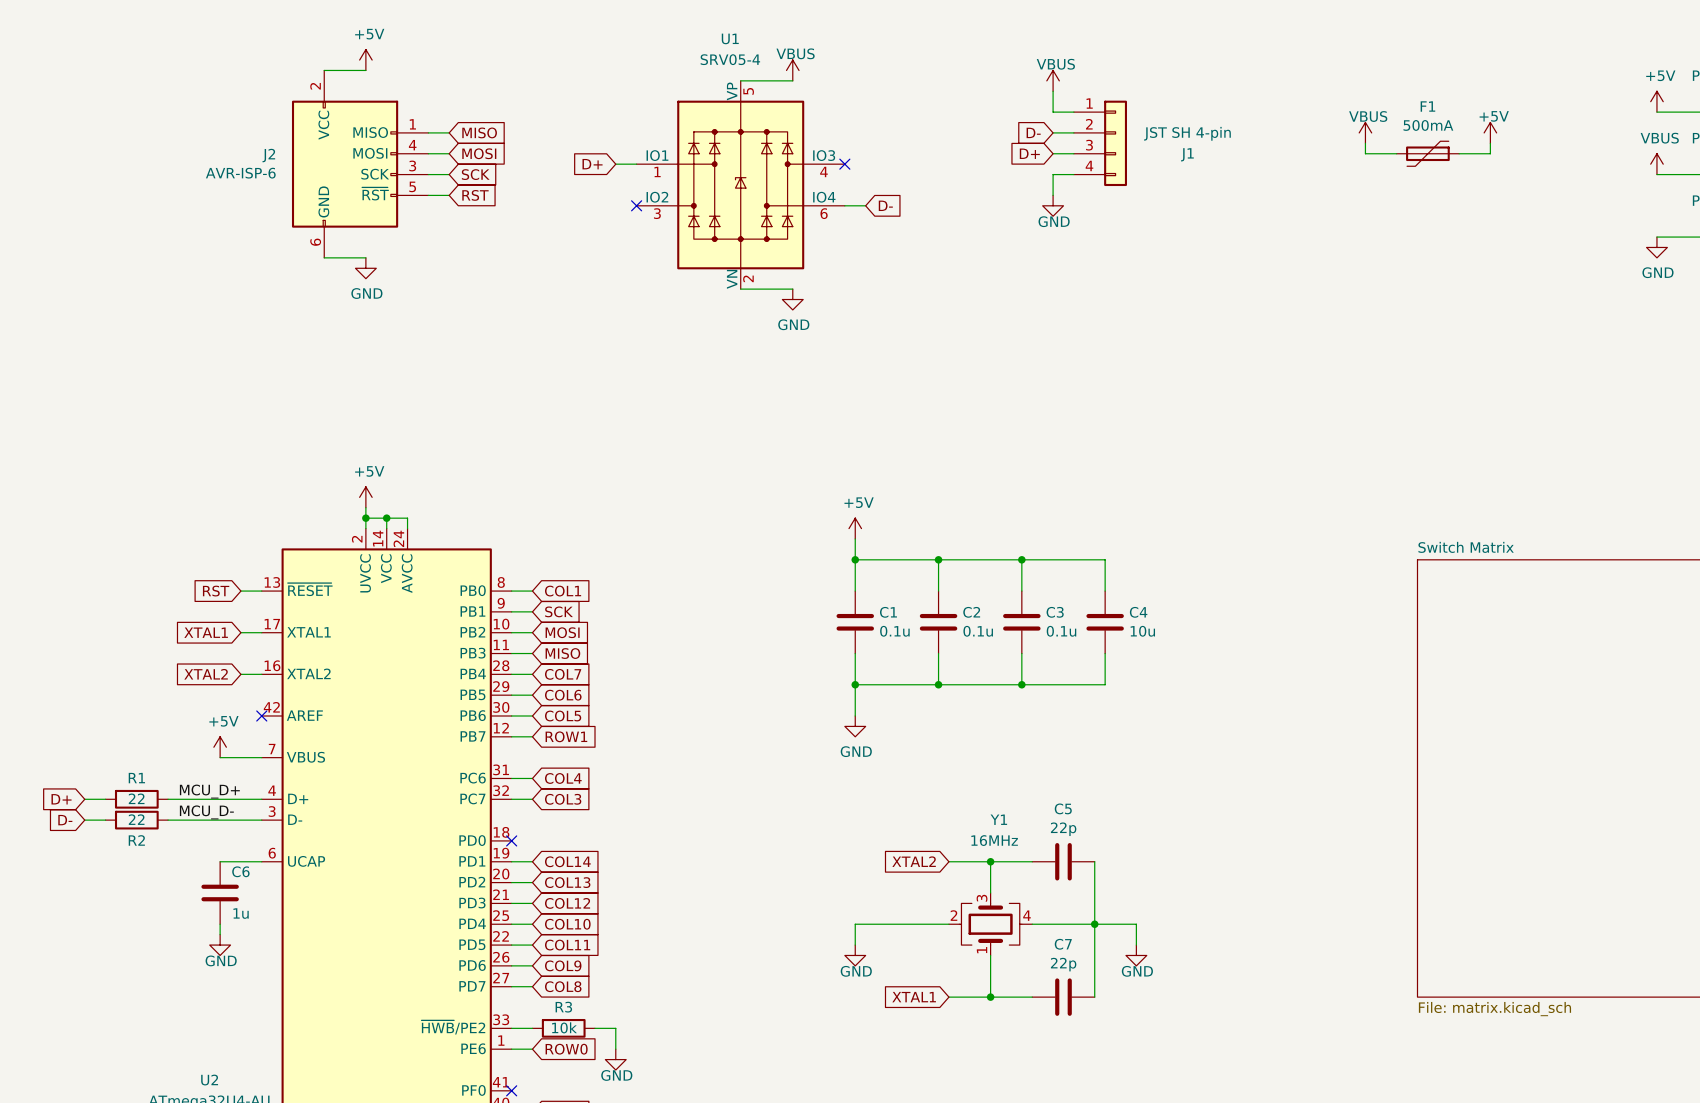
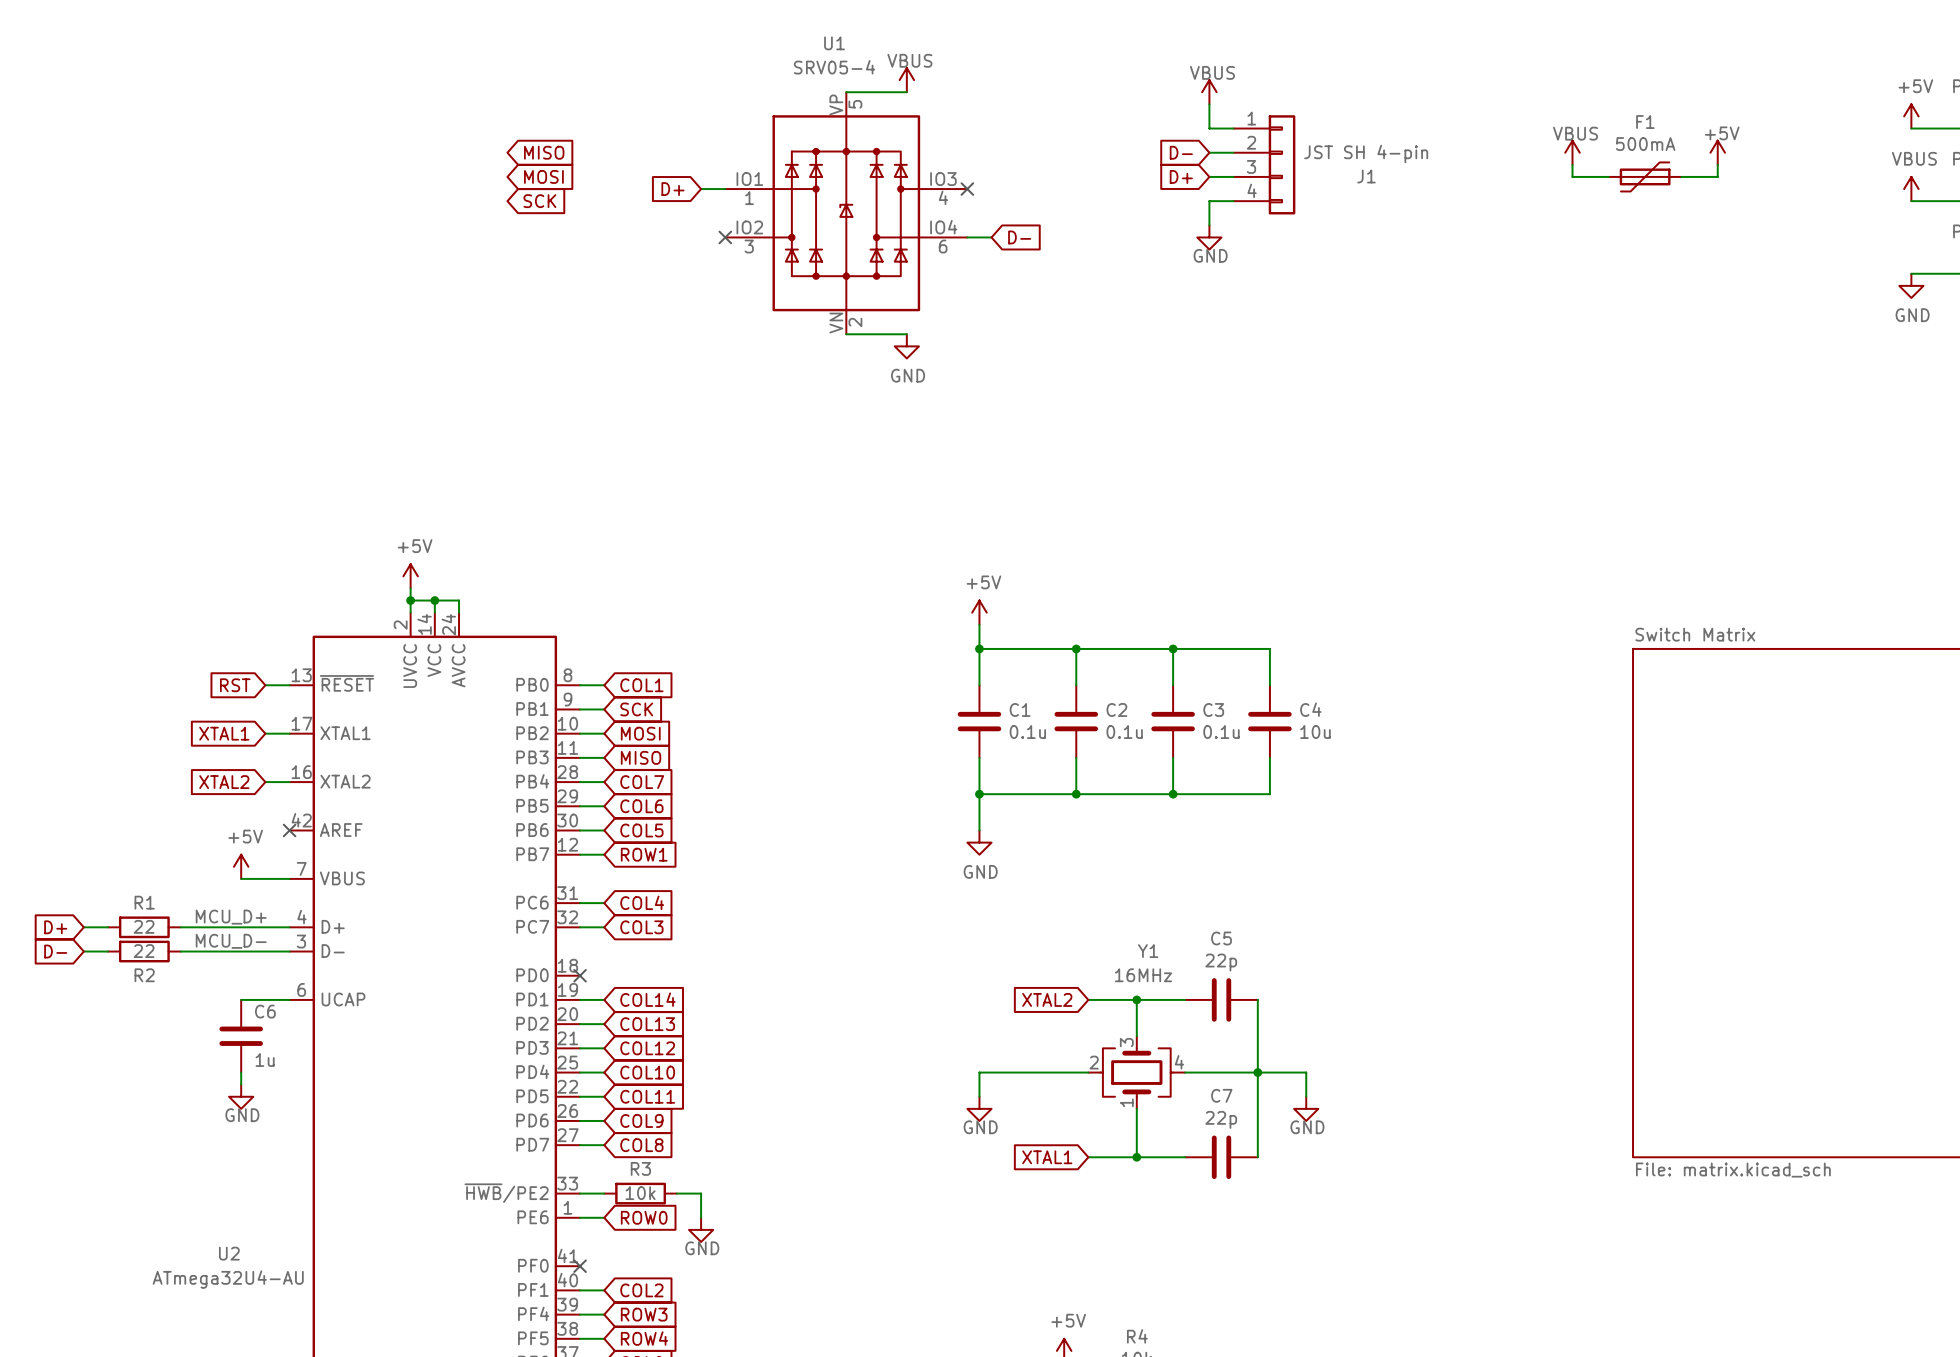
power symbol: +5V (365, 60) -> none
wire: (324, 70) (365, 70) -> none
wire: (428, 132) (449, 132) -> none
wire: (428, 153) (449, 153) -> none
J2: AVR-ISP-6 (360, 164) -> none
wire: (428, 174) (449, 174) -> none
wire: (428, 195) (449, 195) -> none
global label: RST (475, 195) -> none
wire: (324, 257) (365, 257) -> none
power symbol: GND (365, 268) -> none

